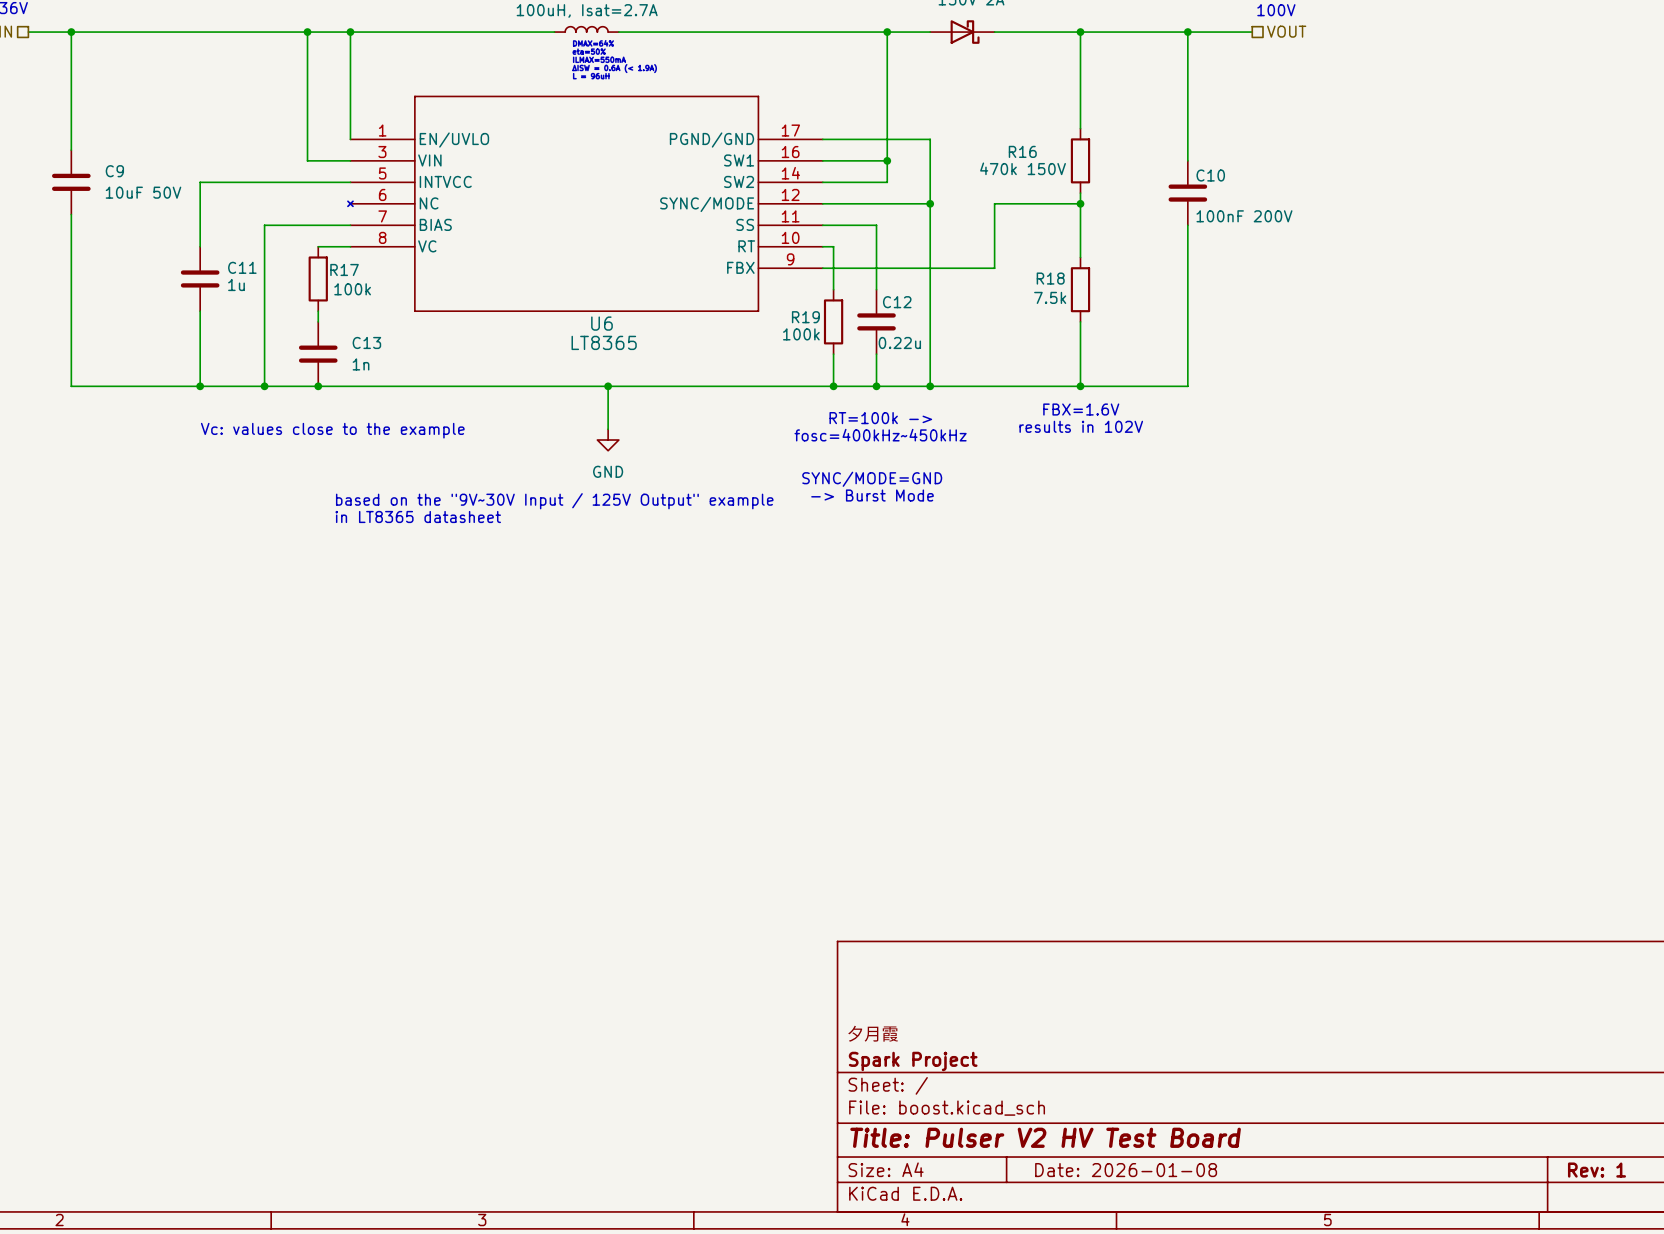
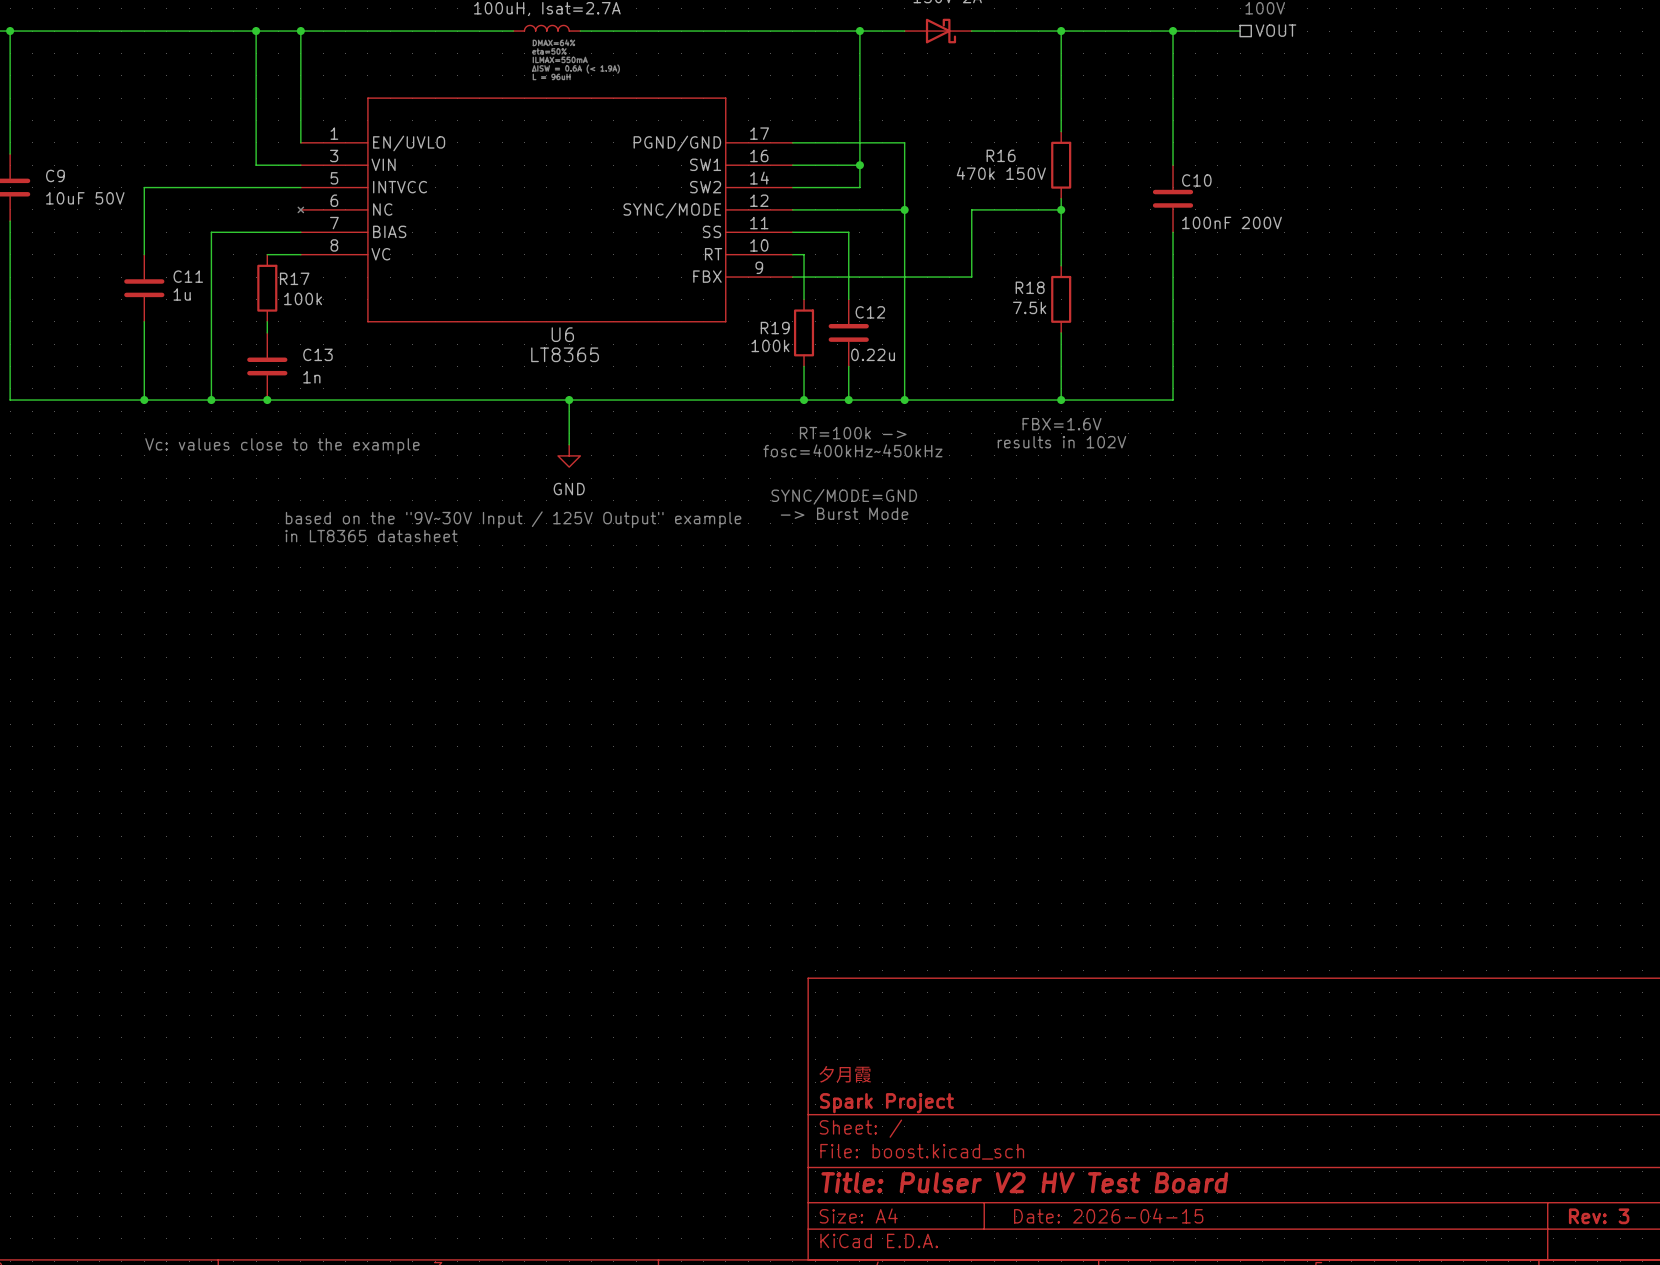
title block: Date: 2026-01-08 (1126, 1170) -> Date: 2026-04-15 (1108, 1215)
title block: Rev: 1 (1596, 1170) -> Rev: 3 (1599, 1216)

